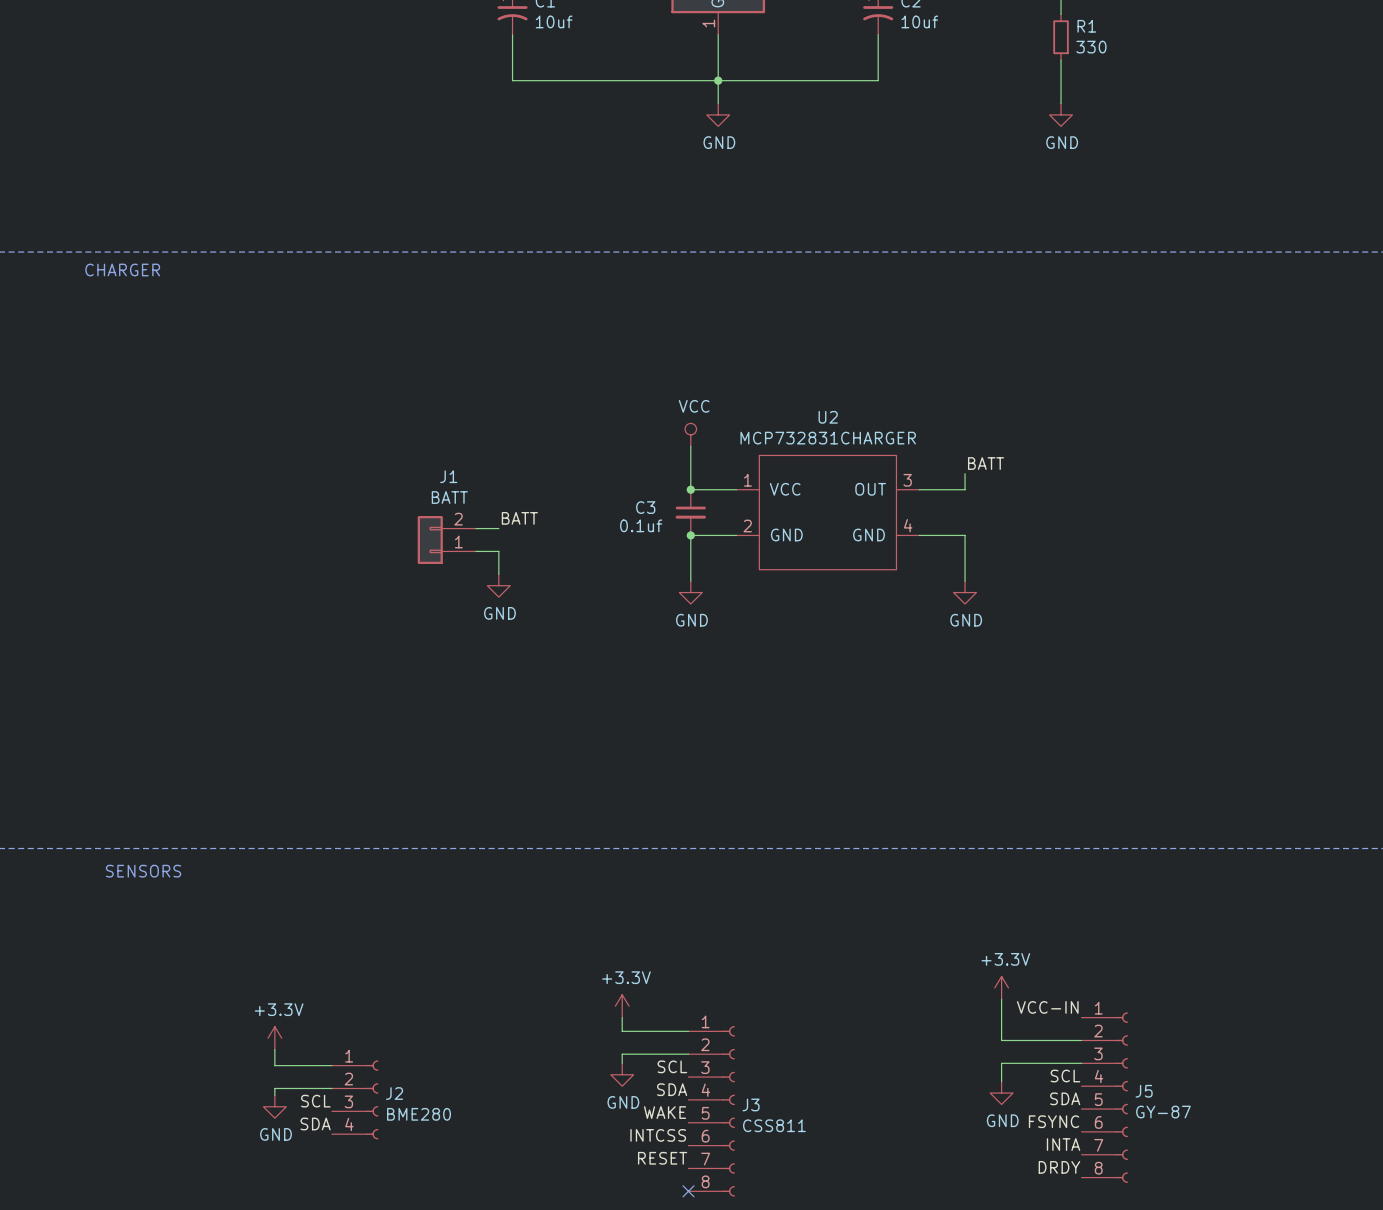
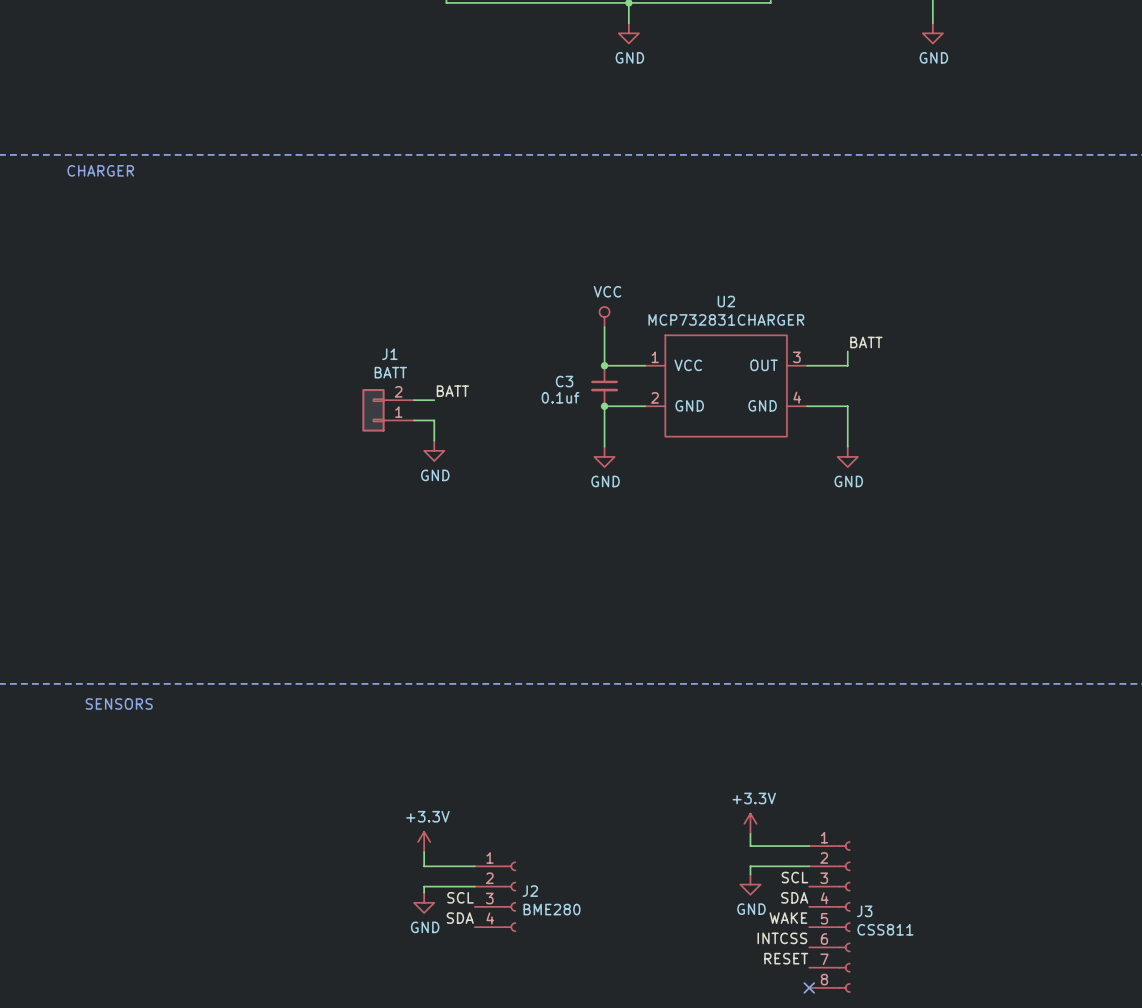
power symbol: +3.3V (1001, 987) -> none
wire: (1001, 999) (1001, 1040) (1081, 1040) -> none
power symbol: +3.3V (622, 1006) -> none
power symbol: none -> +3.3V (750, 823)
label: VCC-IN (1047, 1007) -> none
wire: (622, 1017) (622, 1031) (688, 1031) -> none
wire: none -> (750, 833) (750, 846) (809, 846)
power symbol: none -> +3.3V (424, 842)
power symbol: +3.3V (274, 1038) -> none
wire: (274, 1049) (274, 1065) (332, 1065) -> (424, 852) (424, 866) (474, 866)
wire: (688, 1054) (622, 1054) (622, 1063) -> none
wire: none -> (809, 866) (750, 866) (750, 874)
wire: (1081, 1063) (1001, 1063) (1001, 1081) -> none
label: SCL (672, 1066) -> none
label: none -> SCL (794, 877)
power symbol: GND (622, 1074) -> none
power symbol: none -> GND (750, 884)
label: SCL (1065, 1075) -> none
wire: (332, 1088) (274, 1088) (274, 1095) -> (474, 886) (424, 886) (424, 892)
label: none -> SCL (460, 897)
label: SDA (672, 1089) -> none
label: none -> SDA (794, 897)
power symbol: GND (1001, 1093) -> none
power symbol: none -> GND (424, 902)
J5: GY-87 (1104, 1097) -> none
label: SDA (1065, 1098) -> none
J2 position: (355, 1099) -> (495, 896)
label: SCL (315, 1101) -> none
power symbol: GND (274, 1106) -> none
J3 position: (711, 1111) -> (829, 917)
label: none -> SDA (460, 918)
label: WAKE (665, 1112) -> none
label: none -> WAKE (788, 918)
label: FSYNC (1054, 1121) -> none
label: SDA (315, 1123) -> none
label: INTCSS (658, 1135) -> none
label: none -> INTCSS (782, 938)
label: INTA (1063, 1144) -> none
label: RESET (662, 1158) -> none
label: none -> RESET (786, 958)
label: DRDY (1059, 1167) -> none
no-connect mark: (688, 1191) -> none
no-connect mark: none -> (809, 987)

